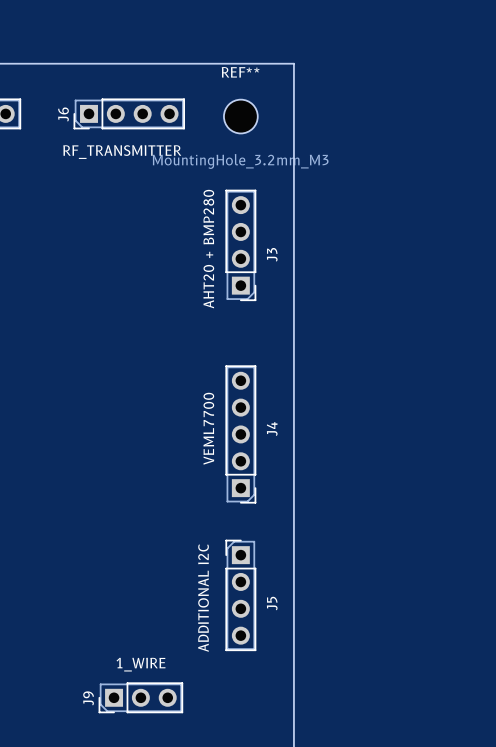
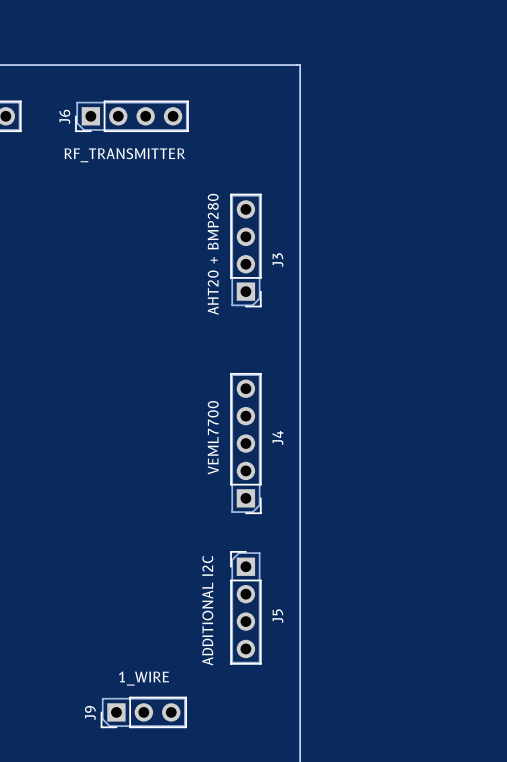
REF**: MountingHole_3.2mm_M3 (240, 116) -> none

